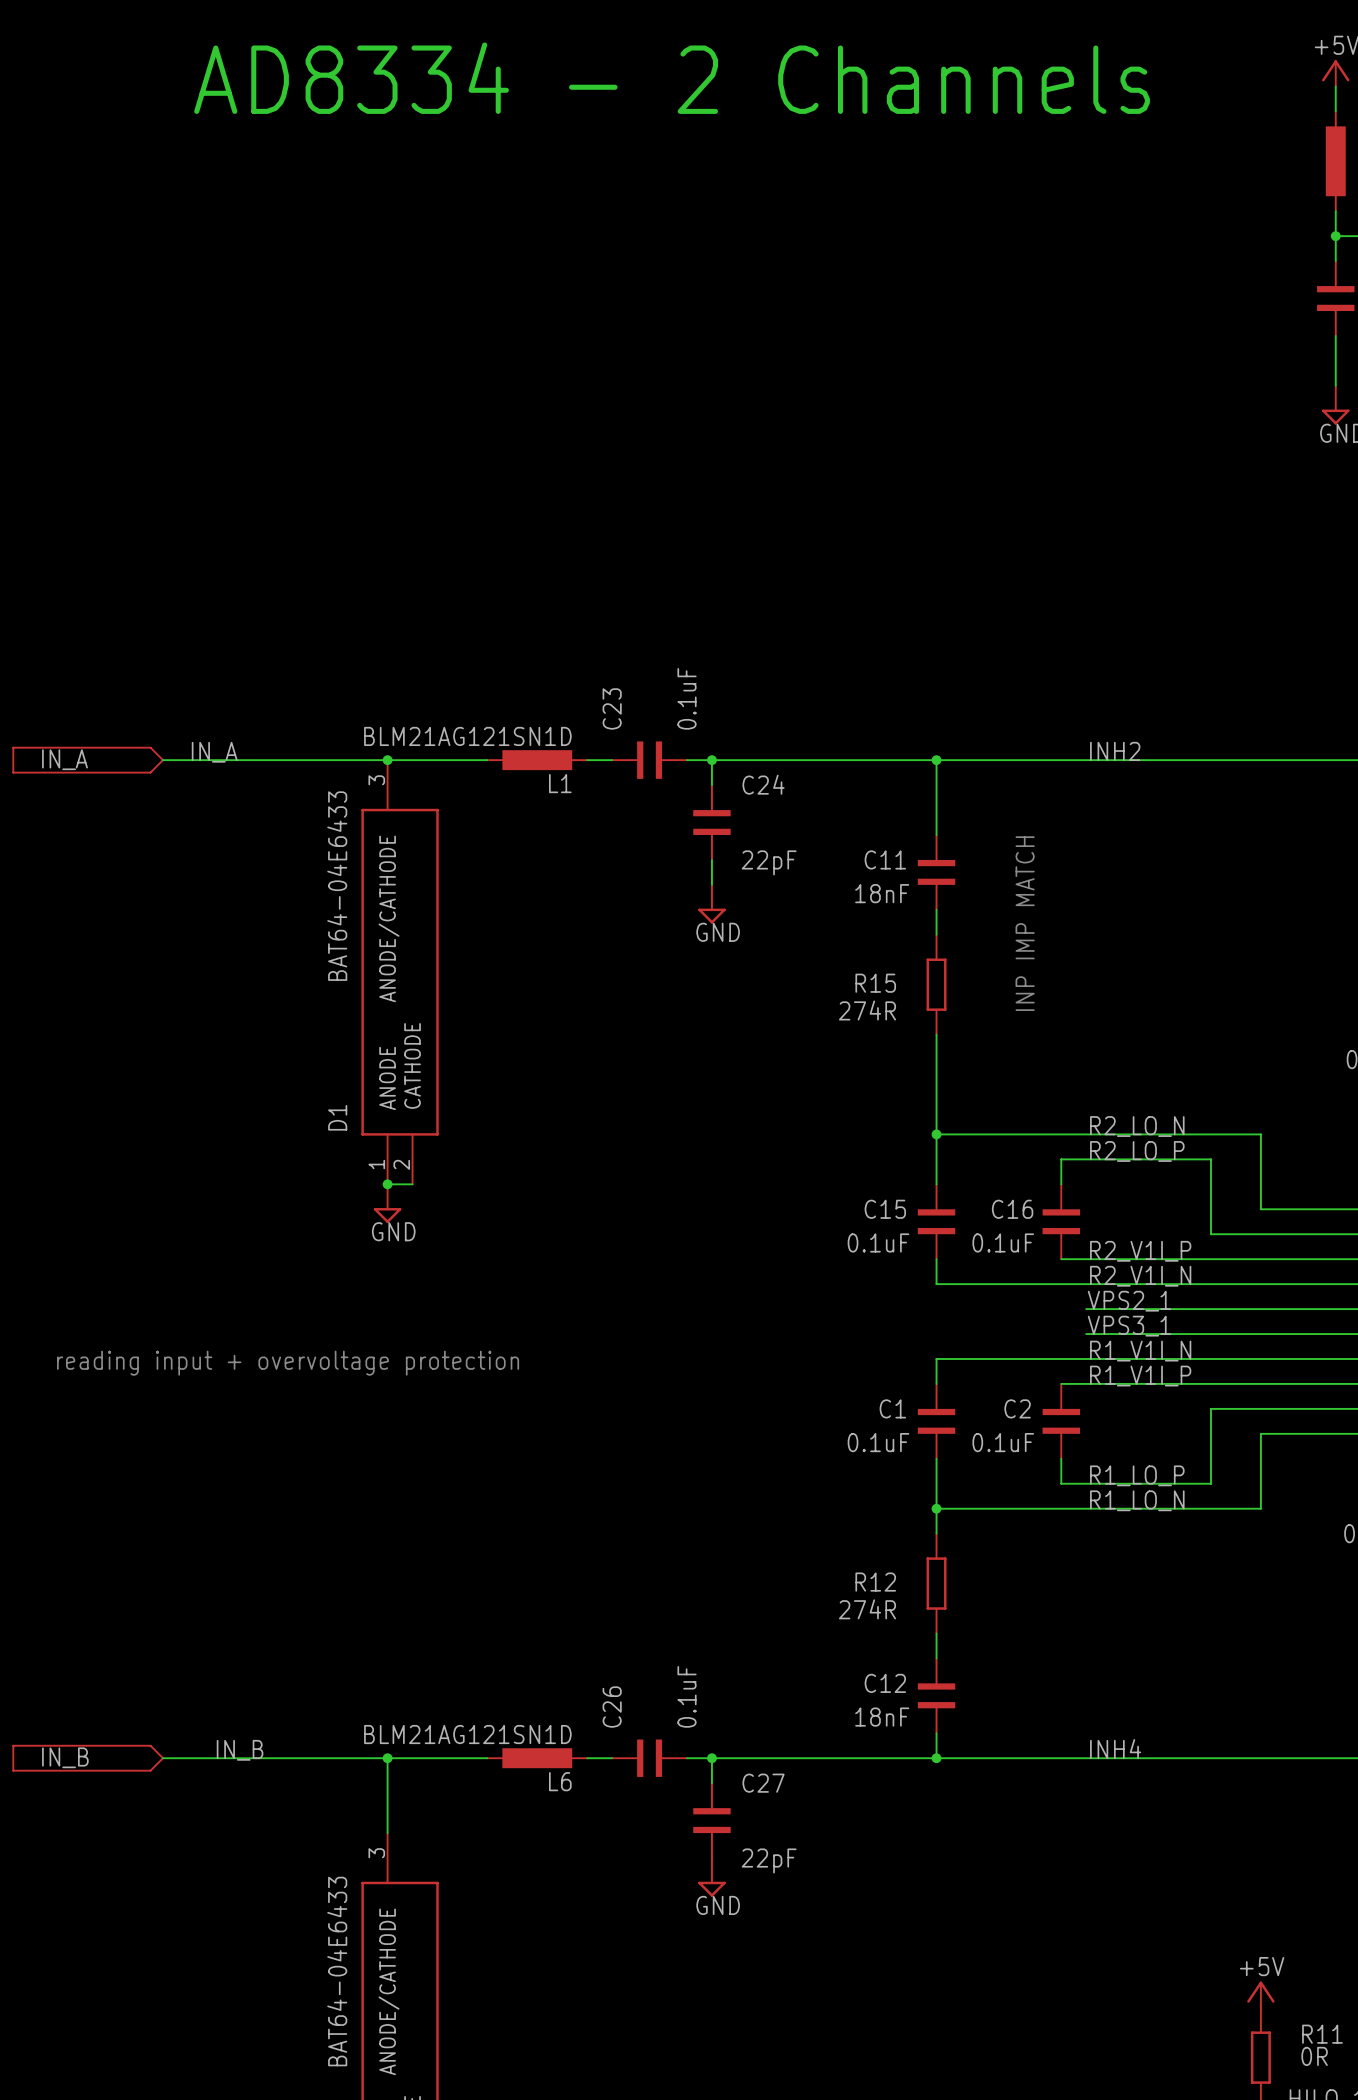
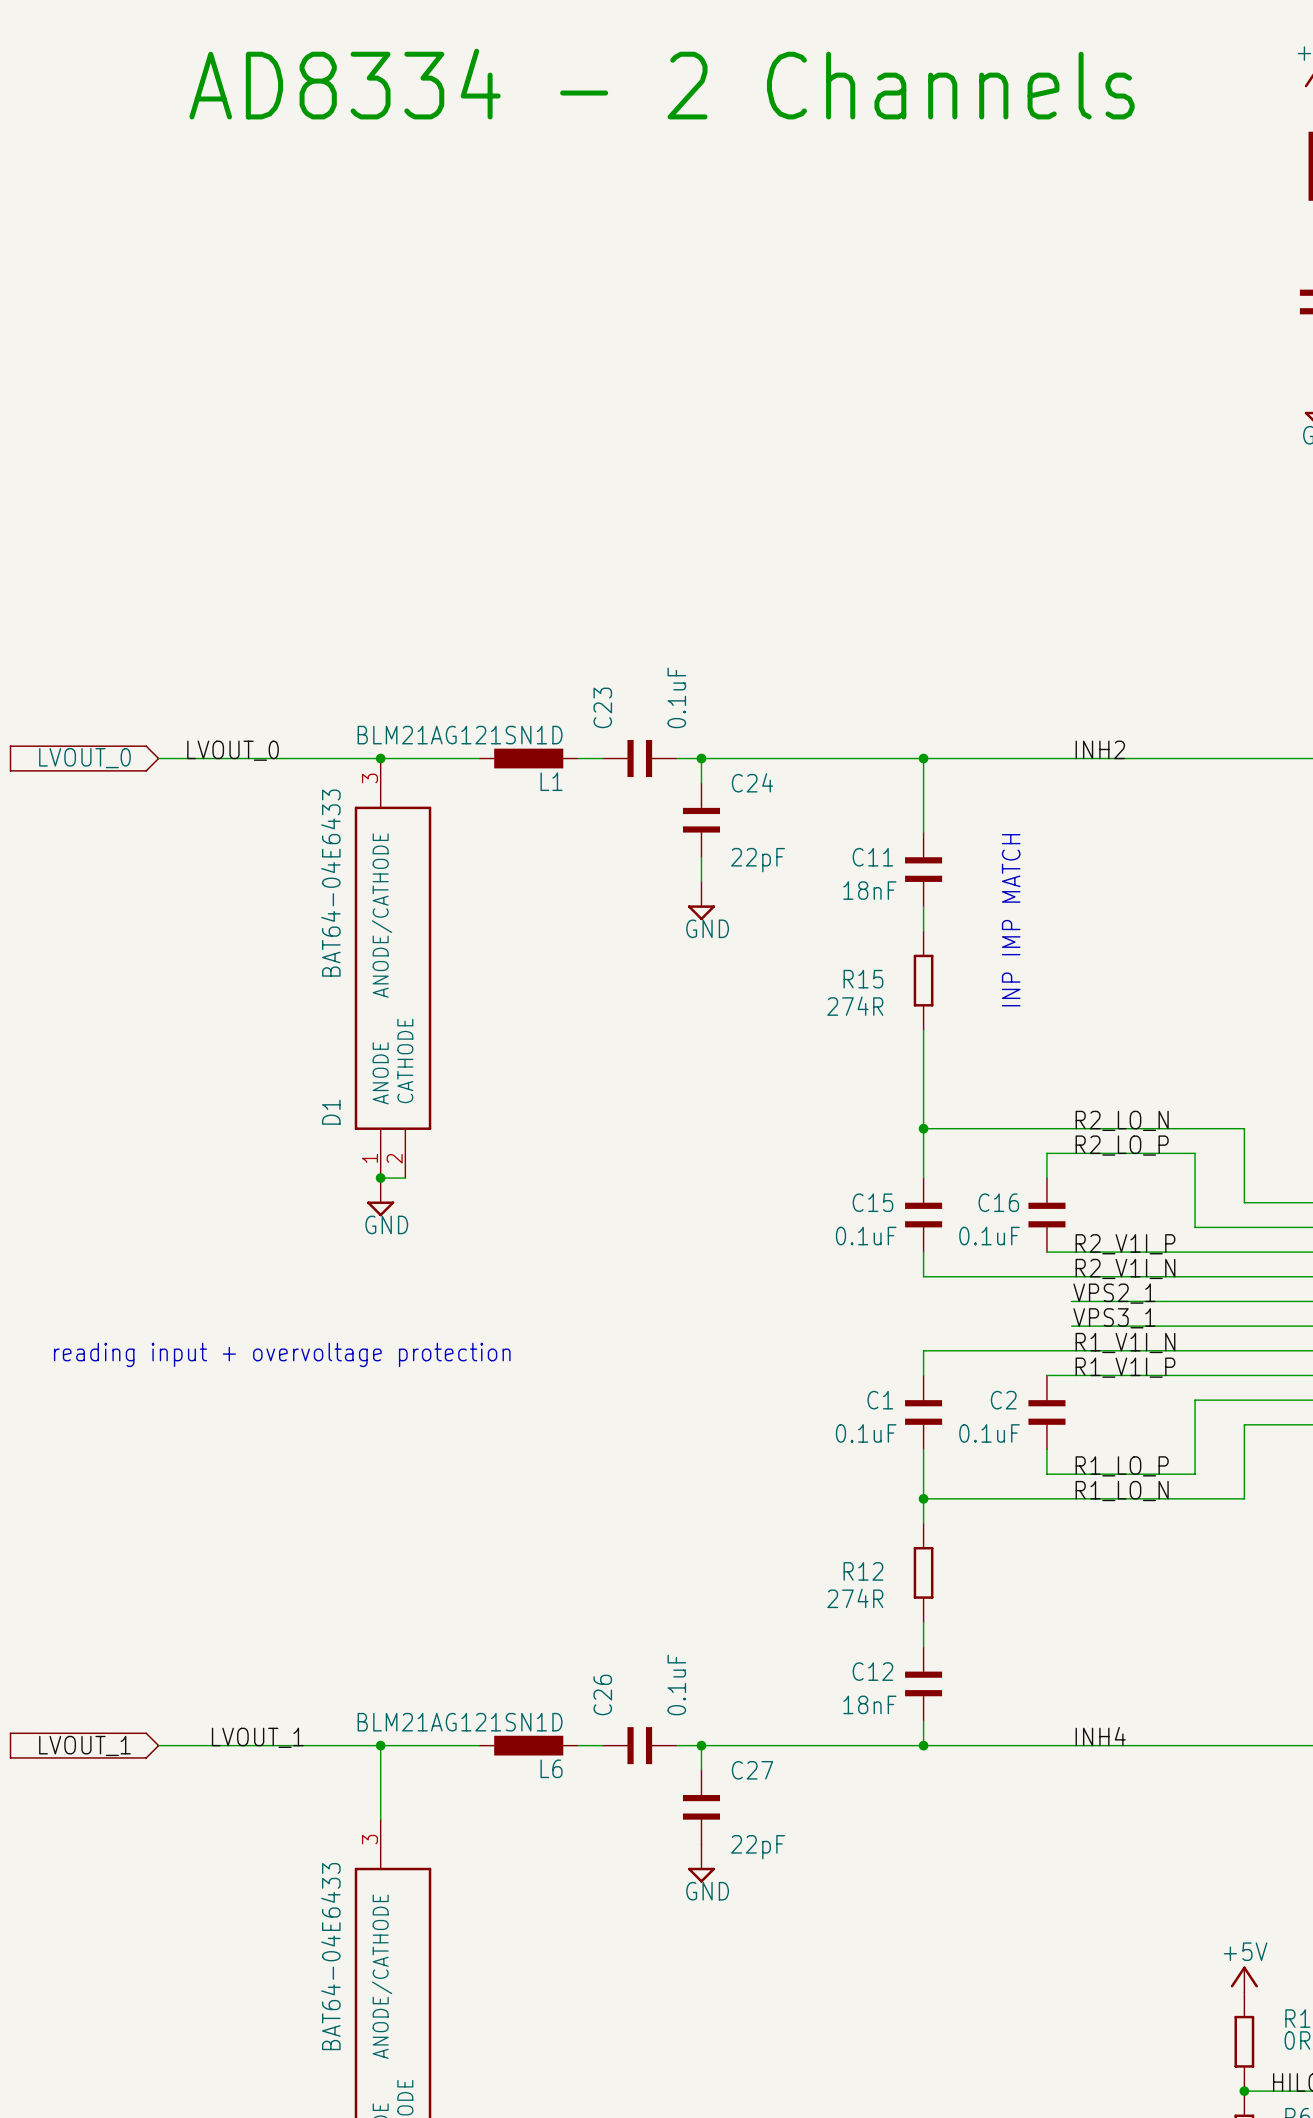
label: IN_A (214, 752) -> LVOUT_0 (233, 750)
part text: IN_A (65, 759) -> LVOUT_0 (84, 758)
label: IN_B (240, 1750) -> LVOUT_1 (257, 1737)
part text: IN_B (65, 1757) -> none
label: none -> LVOUT_1 (84, 1745)

